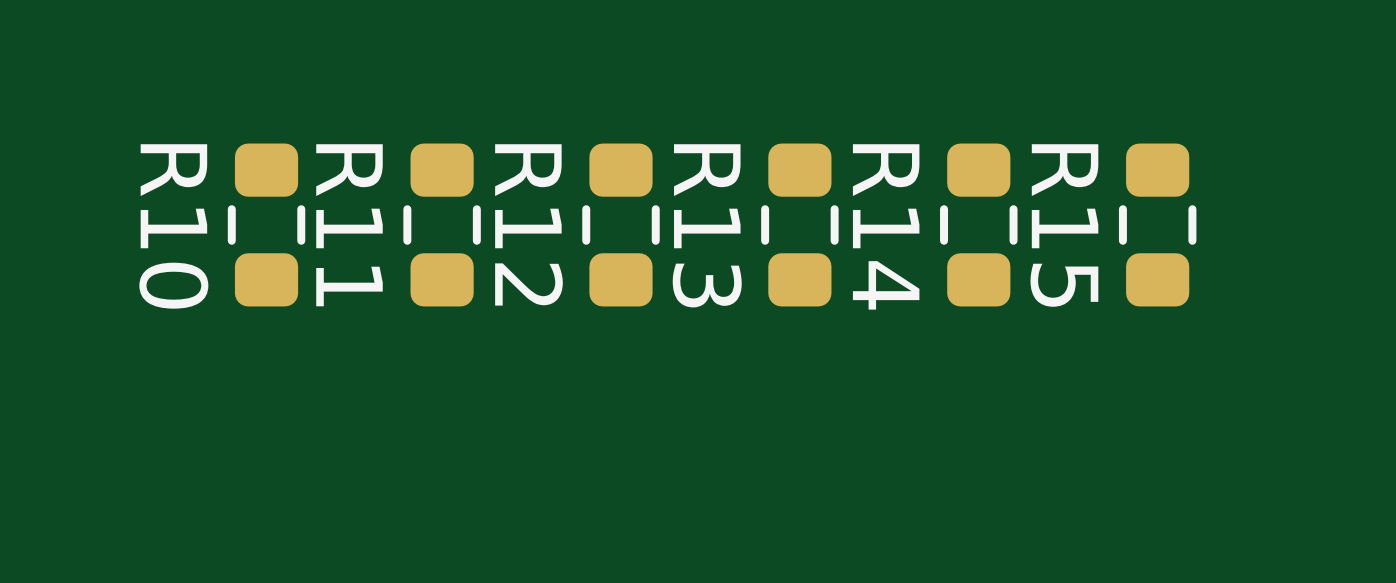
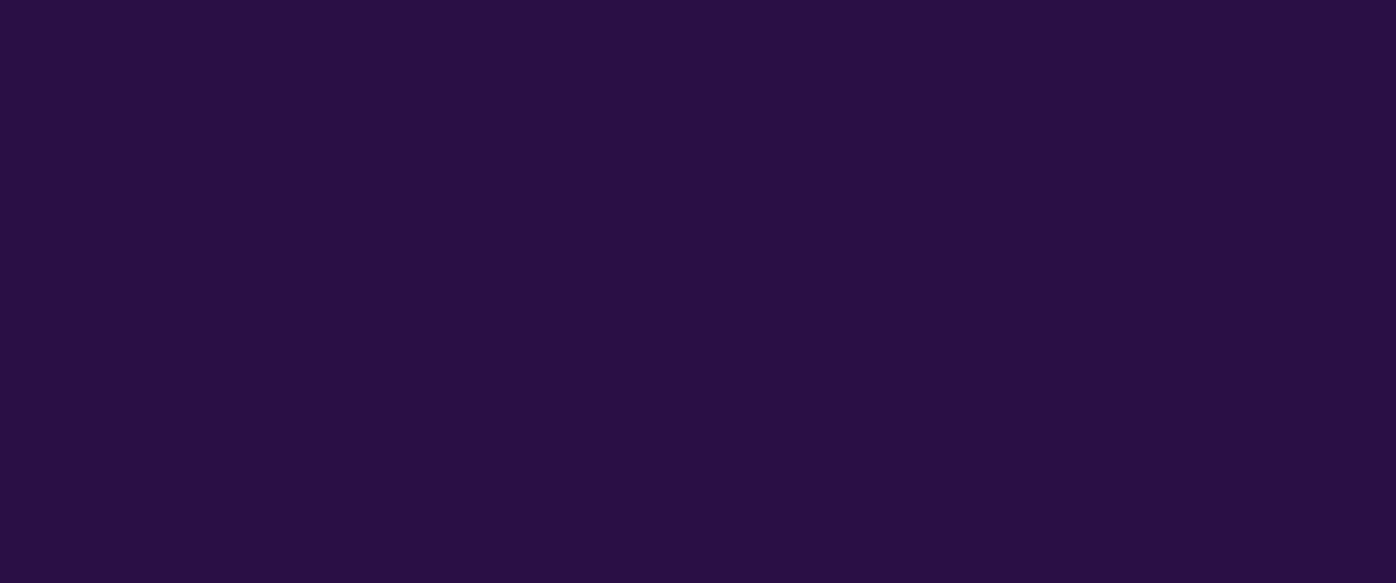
R10: (266, 224) -> none
R11: (442, 224) -> none
R12: (620, 224) -> none
R13: (799, 224) -> none
R14: (978, 224) -> none
R15: (1157, 224) -> none

